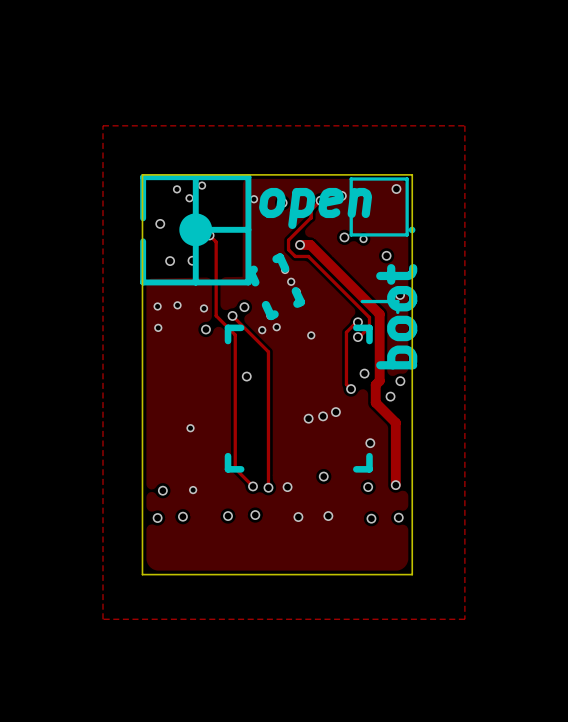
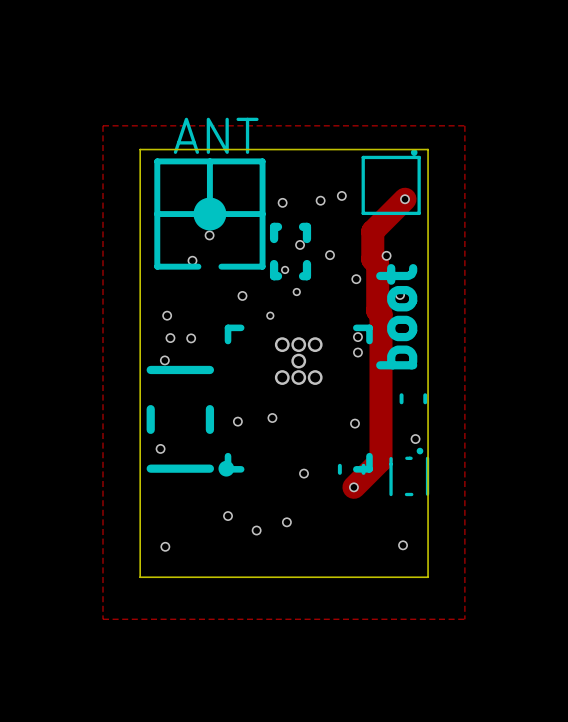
part footprint: [140, 174, 252, 286] -> [154, 158, 266, 270]
board edge: (142, 174) (412, 174) (412, 574) (142, 574) (142, 174) -> (140, 149) (140, 577) (428, 577) (428, 149) (140, 149)
via: (202, 185) -> none
via: (177, 189) -> none
via position: (396, 189) -> (405, 199)
via: (189, 198) -> none
via: (254, 199) -> none
track: none -> (405, 199) (372, 231) (372, 259) (377, 264) (377, 310) (380, 314) (380, 460) (353, 487)
track: (320, 200) (311, 210) (311, 217) -> none
part rotation: 0° (382, 206) -> 90° counterclockwise (391, 182)
text: open (315, 208) -> none
track: (310, 217) (288, 240) (288, 249) (295, 256) (308, 256) (369, 317) (369, 327) (357, 337) -> none
via: (160, 223) -> none
track: (209, 235) (216, 242) (216, 315) (235, 334) (235, 468) (253, 486) -> none
via: (344, 237) -> none
via: (363, 239) -> none
track: (300, 244) (310, 244) (379, 314) (379, 380) (375, 384) (375, 402) (395, 422) (395, 485) -> none
part: none -> (290, 251)
via: none -> (330, 255)
via: (170, 261) -> none
via: none -> (356, 279)
via: (291, 281) -> none
part: (275, 286) -> none
via: none -> (242, 295)
line: (362, 301) (397, 301) (397, 312) -> none
via: (177, 305) -> none
via: (157, 306) -> none
via: (244, 307) -> none
via: (204, 308) -> none
via: none -> (167, 315)
track: (232, 315) (268, 351) (268, 487) -> none
via: (232, 315) -> none
track: (357, 322) (346, 332) (346, 384) (351, 389) -> none
via: (357, 322) -> none
via: (158, 327) -> none
via: (276, 327) -> none
via position: (205, 329) -> (191, 338)
via: (262, 330) -> none
via size: [307, 331, 316, 340] -> [307, 337, 323, 353]
via: none -> (170, 338)
via: none -> (282, 344)
via: none -> (298, 344)
via: none -> (357, 352)
via: none -> (164, 360)
via: none -> (298, 361)
via: (364, 373) -> none
via: (246, 376) -> none
via: none -> (282, 377)
via: none -> (298, 377)
via: none -> (315, 377)
via: (400, 381) -> none
via: (351, 389) -> none
via: (390, 396) -> none
part: none -> (413, 398)
via: (335, 412) -> none
via: (323, 416) -> none
via: none -> (272, 418)
via: (308, 418) -> none
part: none -> (190, 421)
via: none -> (237, 421)
via: none -> (355, 423)
via: (190, 428) -> none
via: none -> (415, 439)
via: (370, 443) -> none
via: none -> (160, 448)
part: none -> (351, 469)
part: none -> (409, 471)
via: none -> (304, 473)
via: (323, 476) -> none
via: (395, 485) -> none
via: (253, 486) -> none
via: (268, 487) -> none
via: (287, 487) -> none
via position: (368, 487) -> (353, 487)
via: (162, 490) -> none
via: (193, 490) -> none
via position: (255, 515) -> (256, 530)
via: (182, 516) -> none
via: (328, 516) -> none
via position: (298, 517) -> (286, 522)
via: (398, 517) -> none
via: (157, 518) -> none
via: (371, 518) -> none
via: none -> (403, 545)
via: none -> (165, 546)

